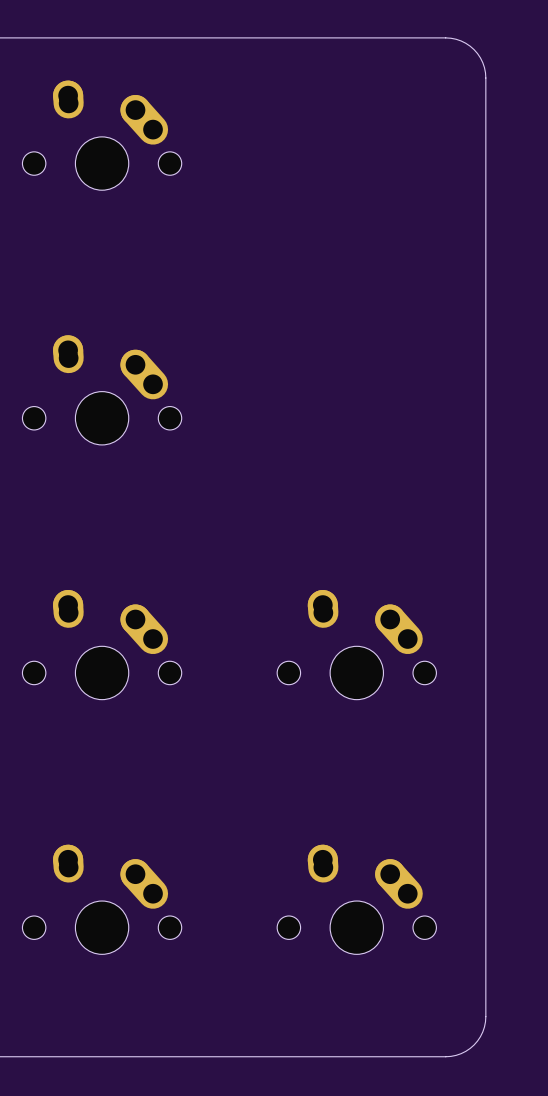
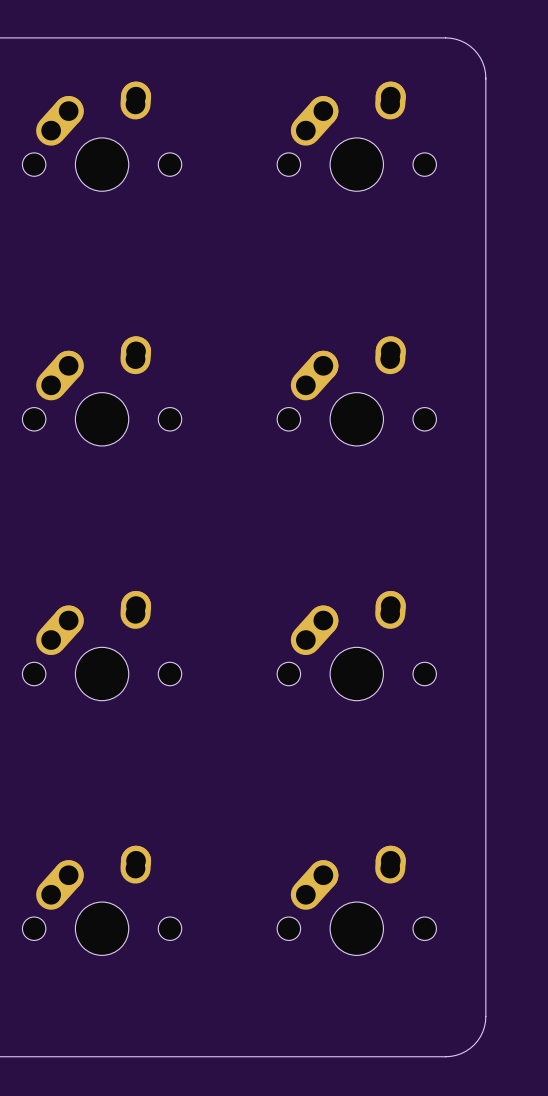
part side: top (102, 135) -> bottom (102, 136)
part: none -> (356, 136)
part side: top (102, 390) -> bottom (102, 391)
part: none -> (356, 391)
part side: top (102, 644) -> bottom (102, 645)
part side: top (356, 644) -> bottom (356, 645)
part side: top (102, 899) -> bottom (102, 900)
part side: top (356, 899) -> bottom (356, 900)

